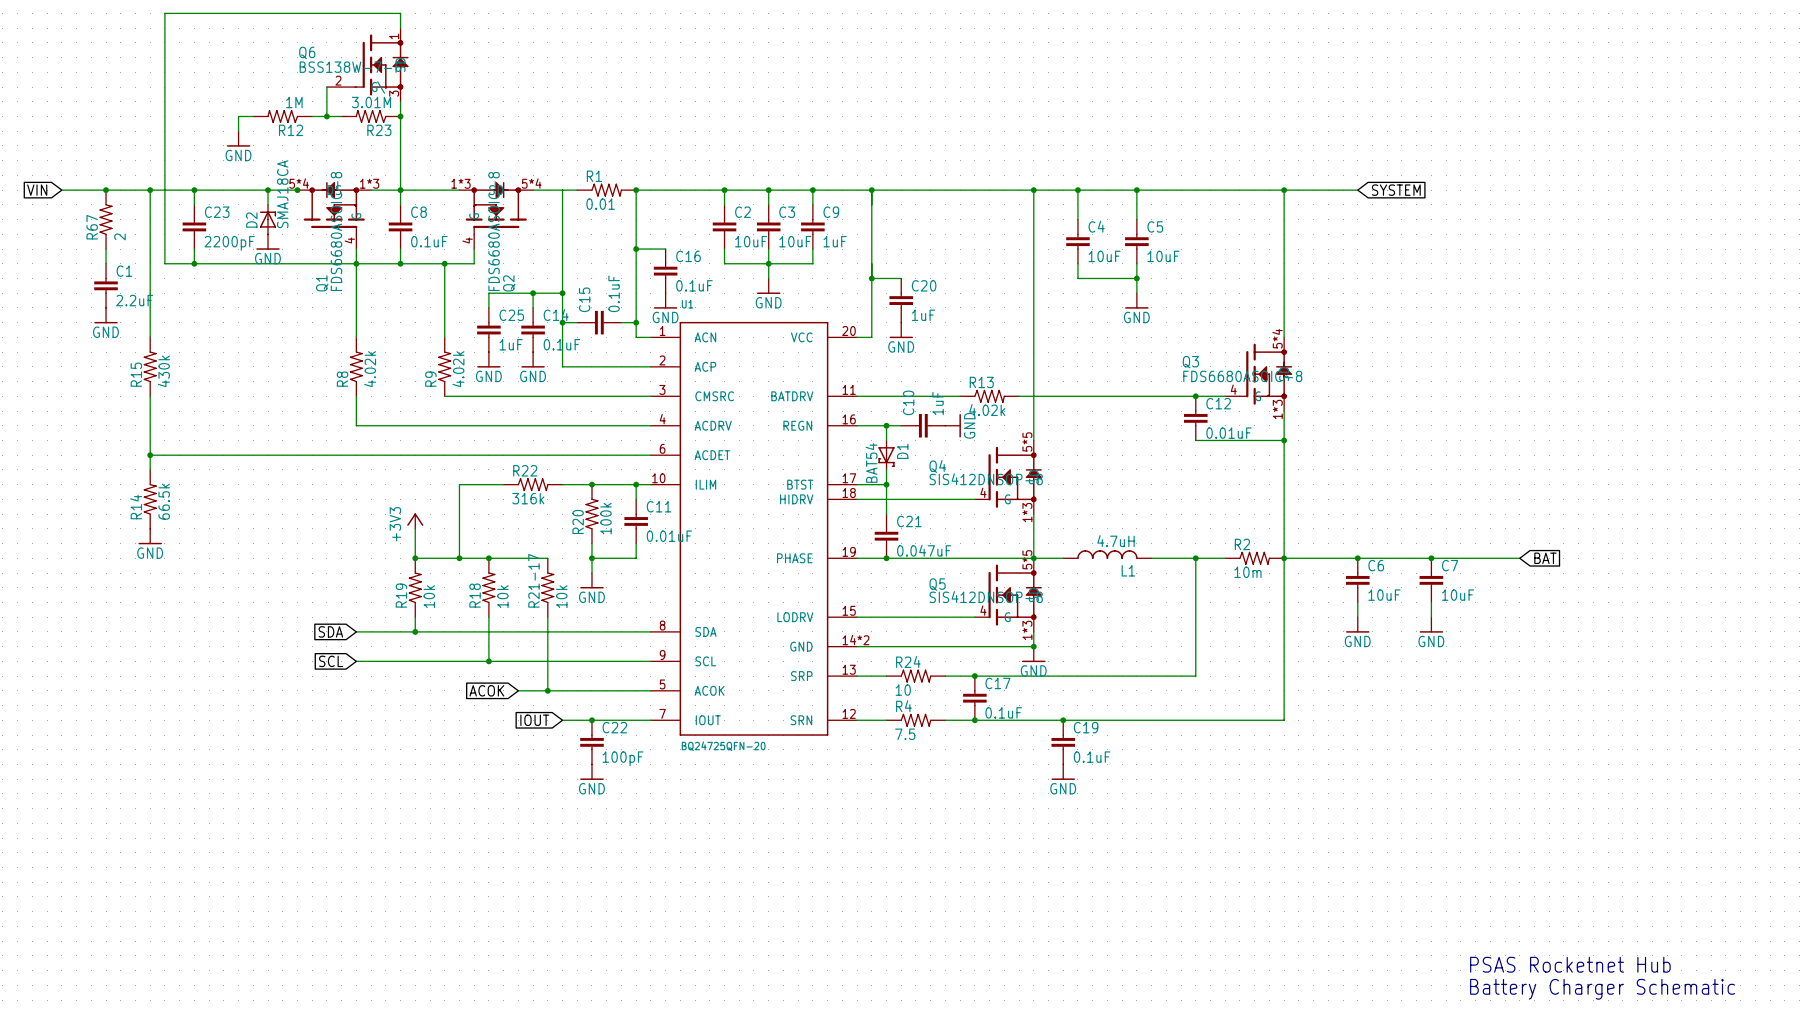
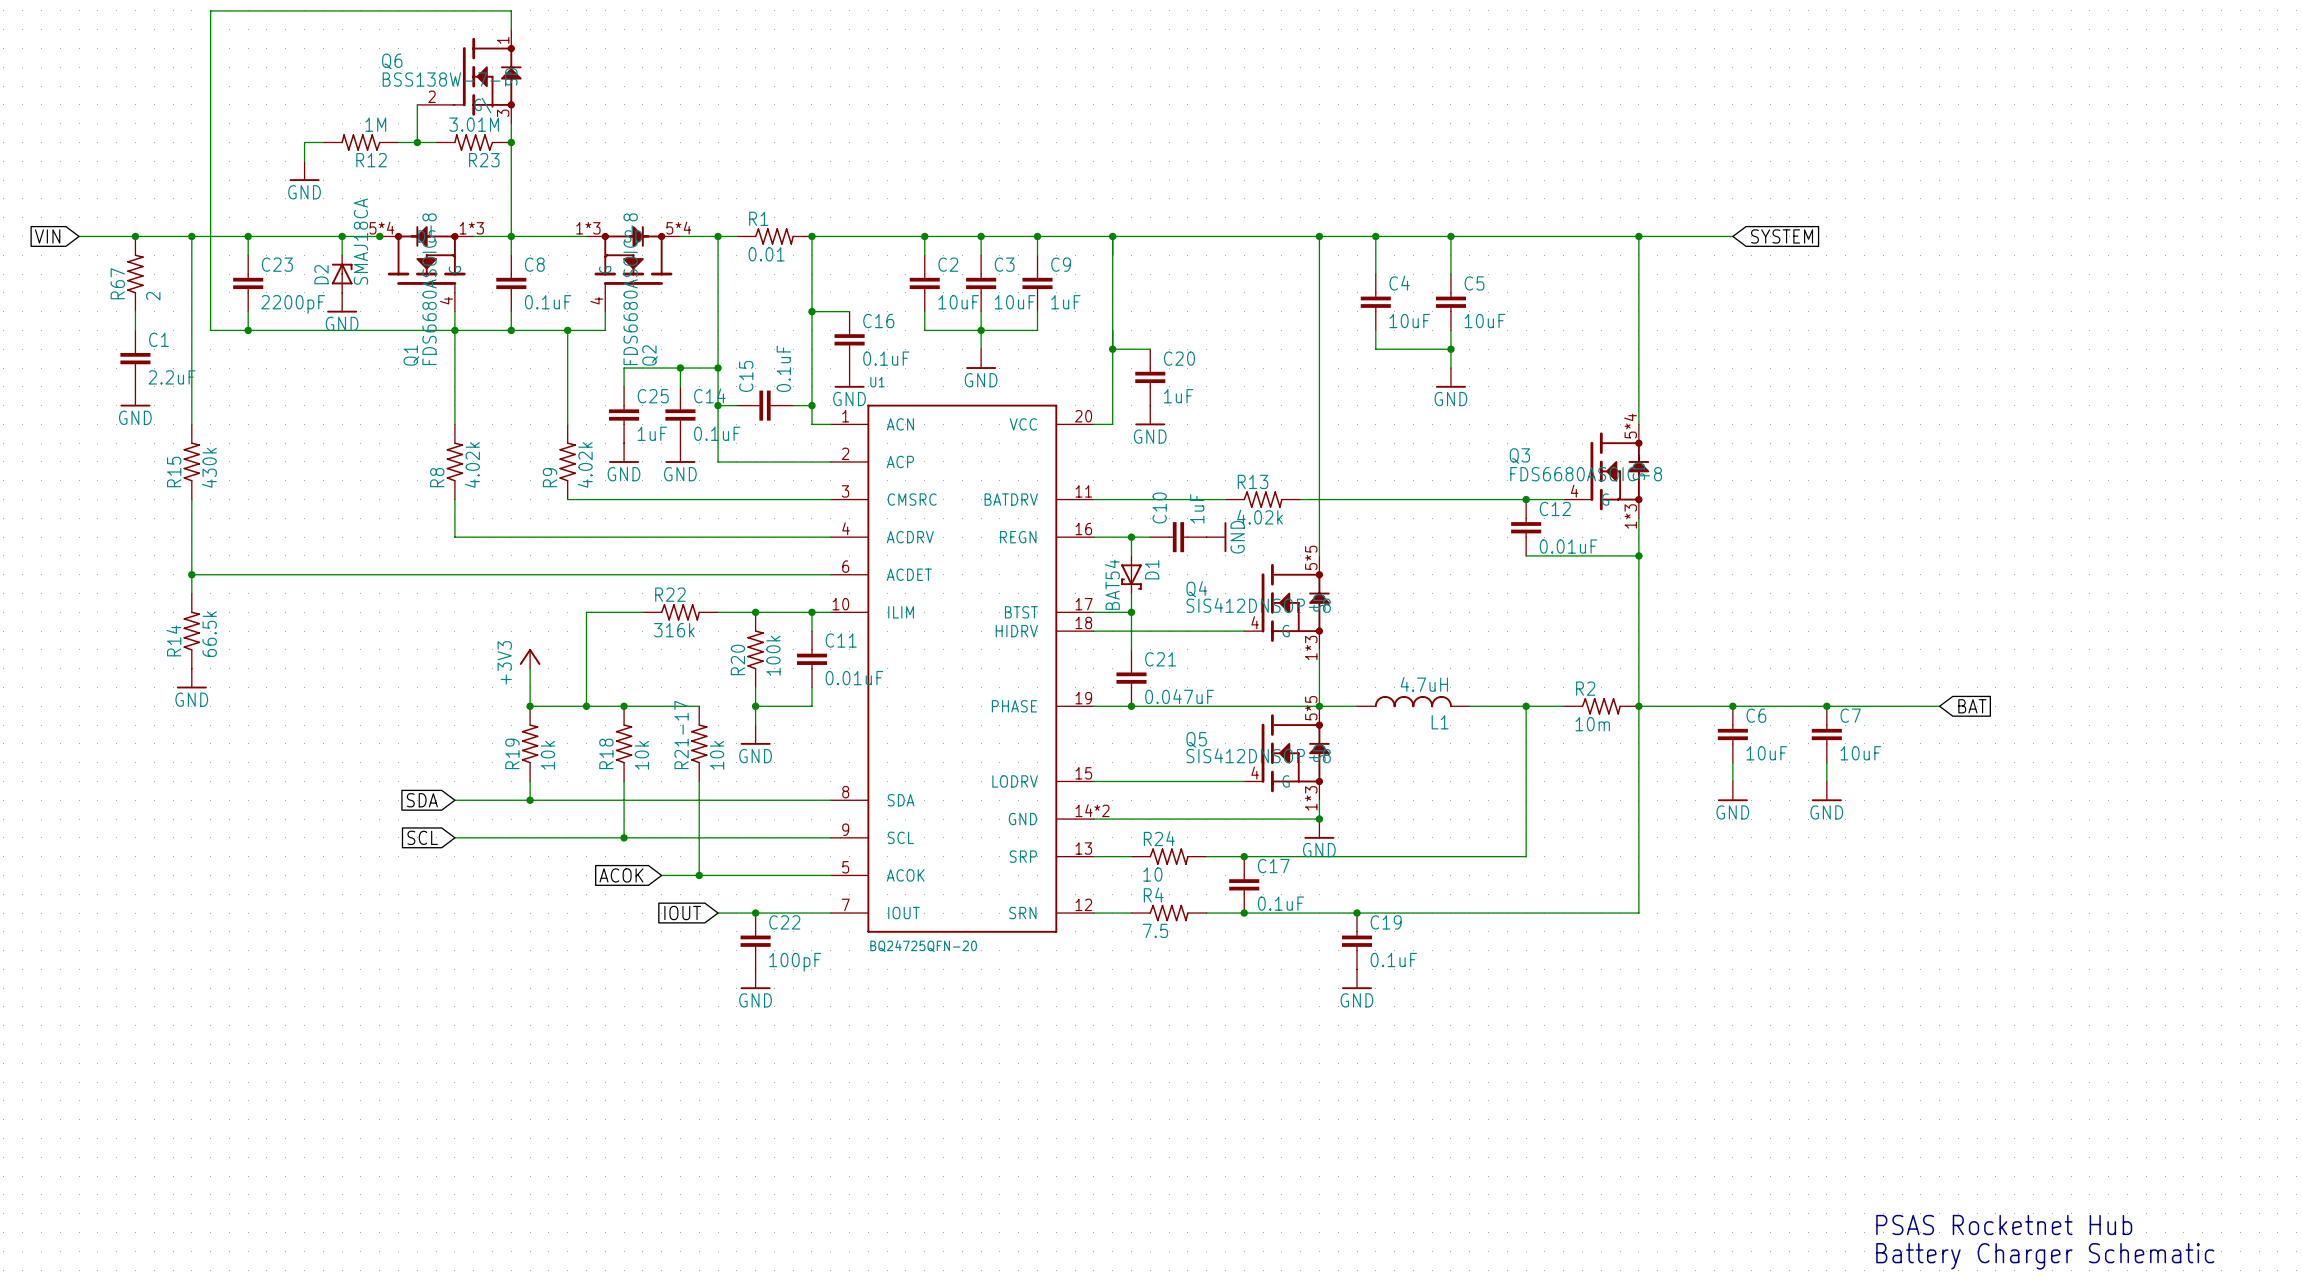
junction: none -> (718, 236)

